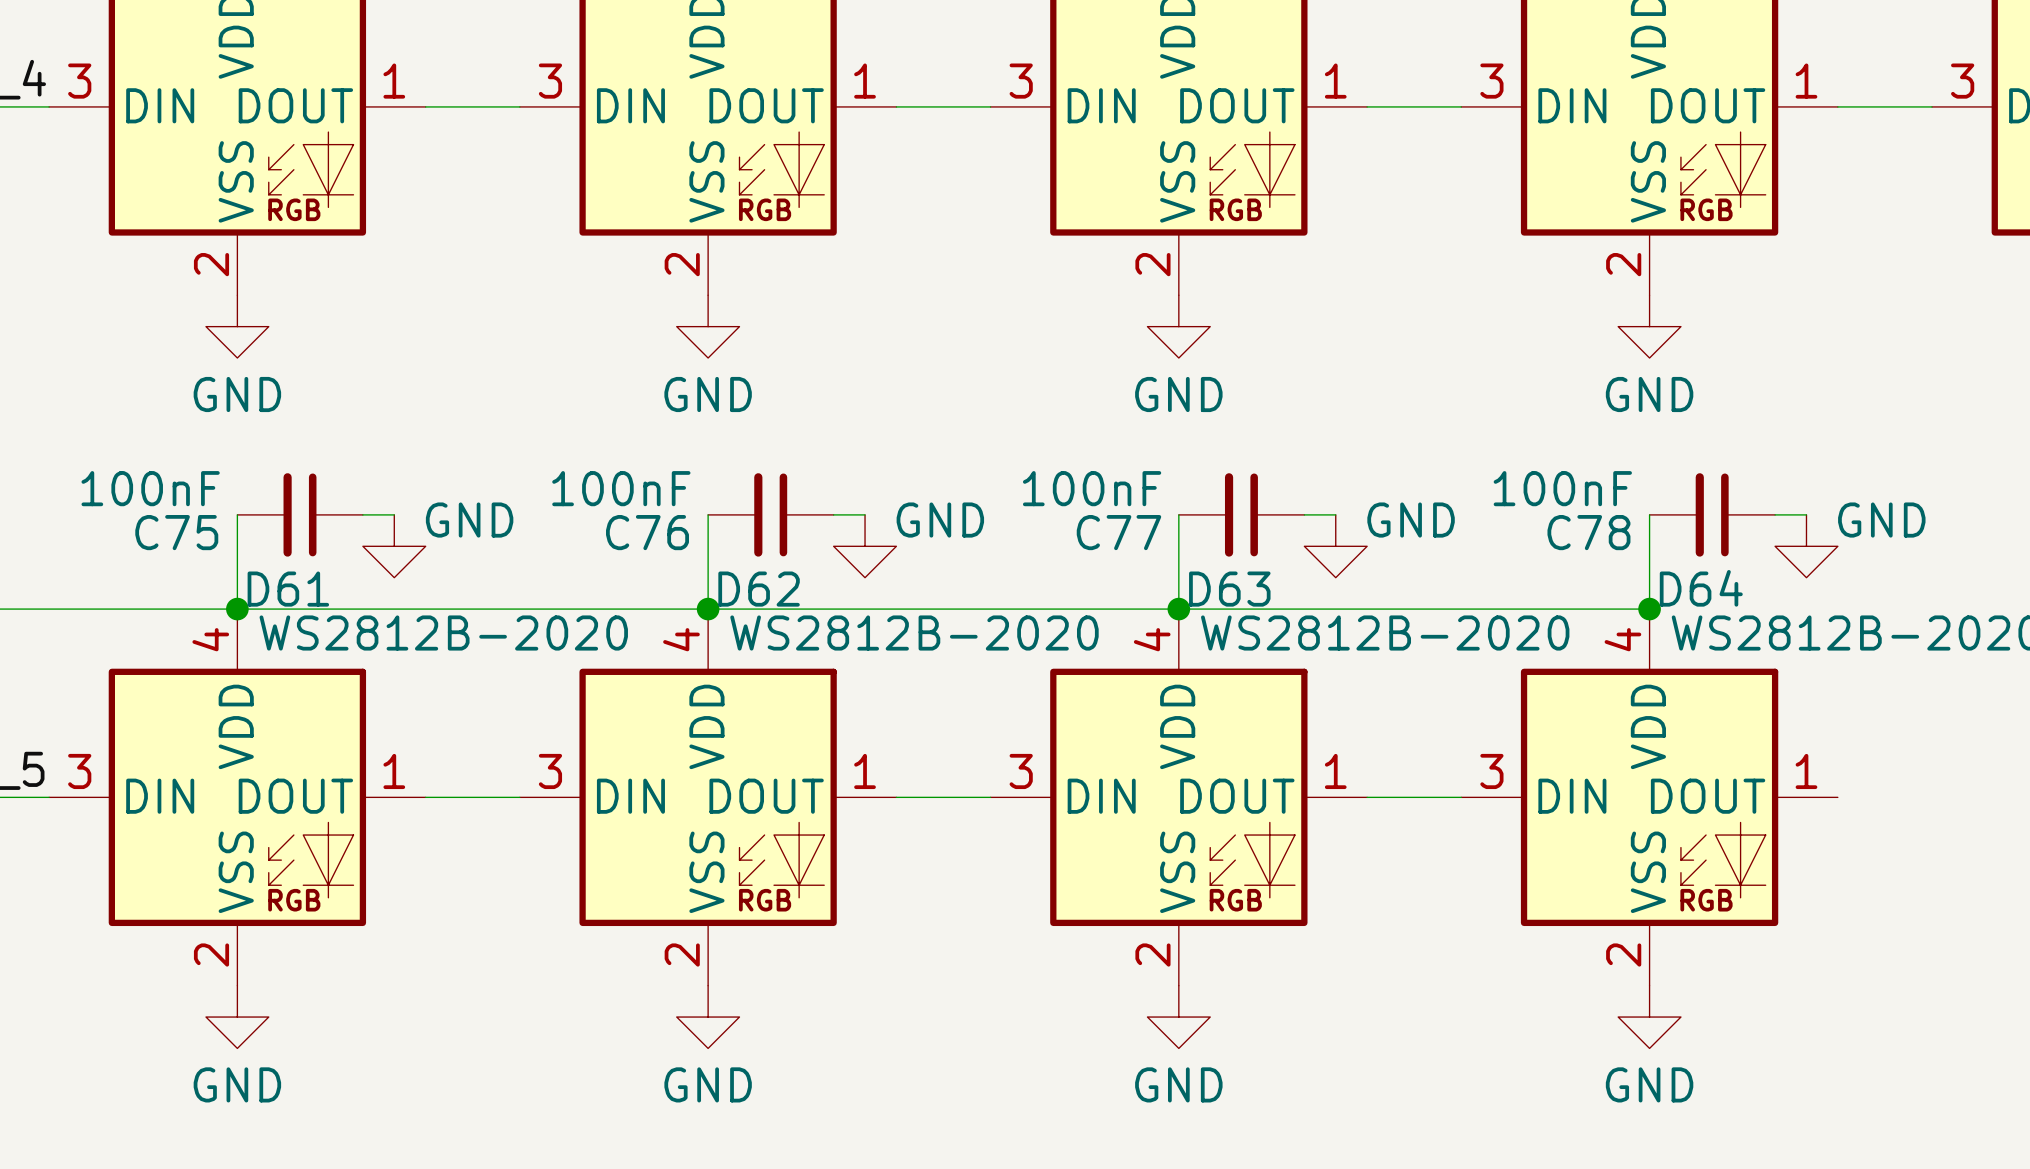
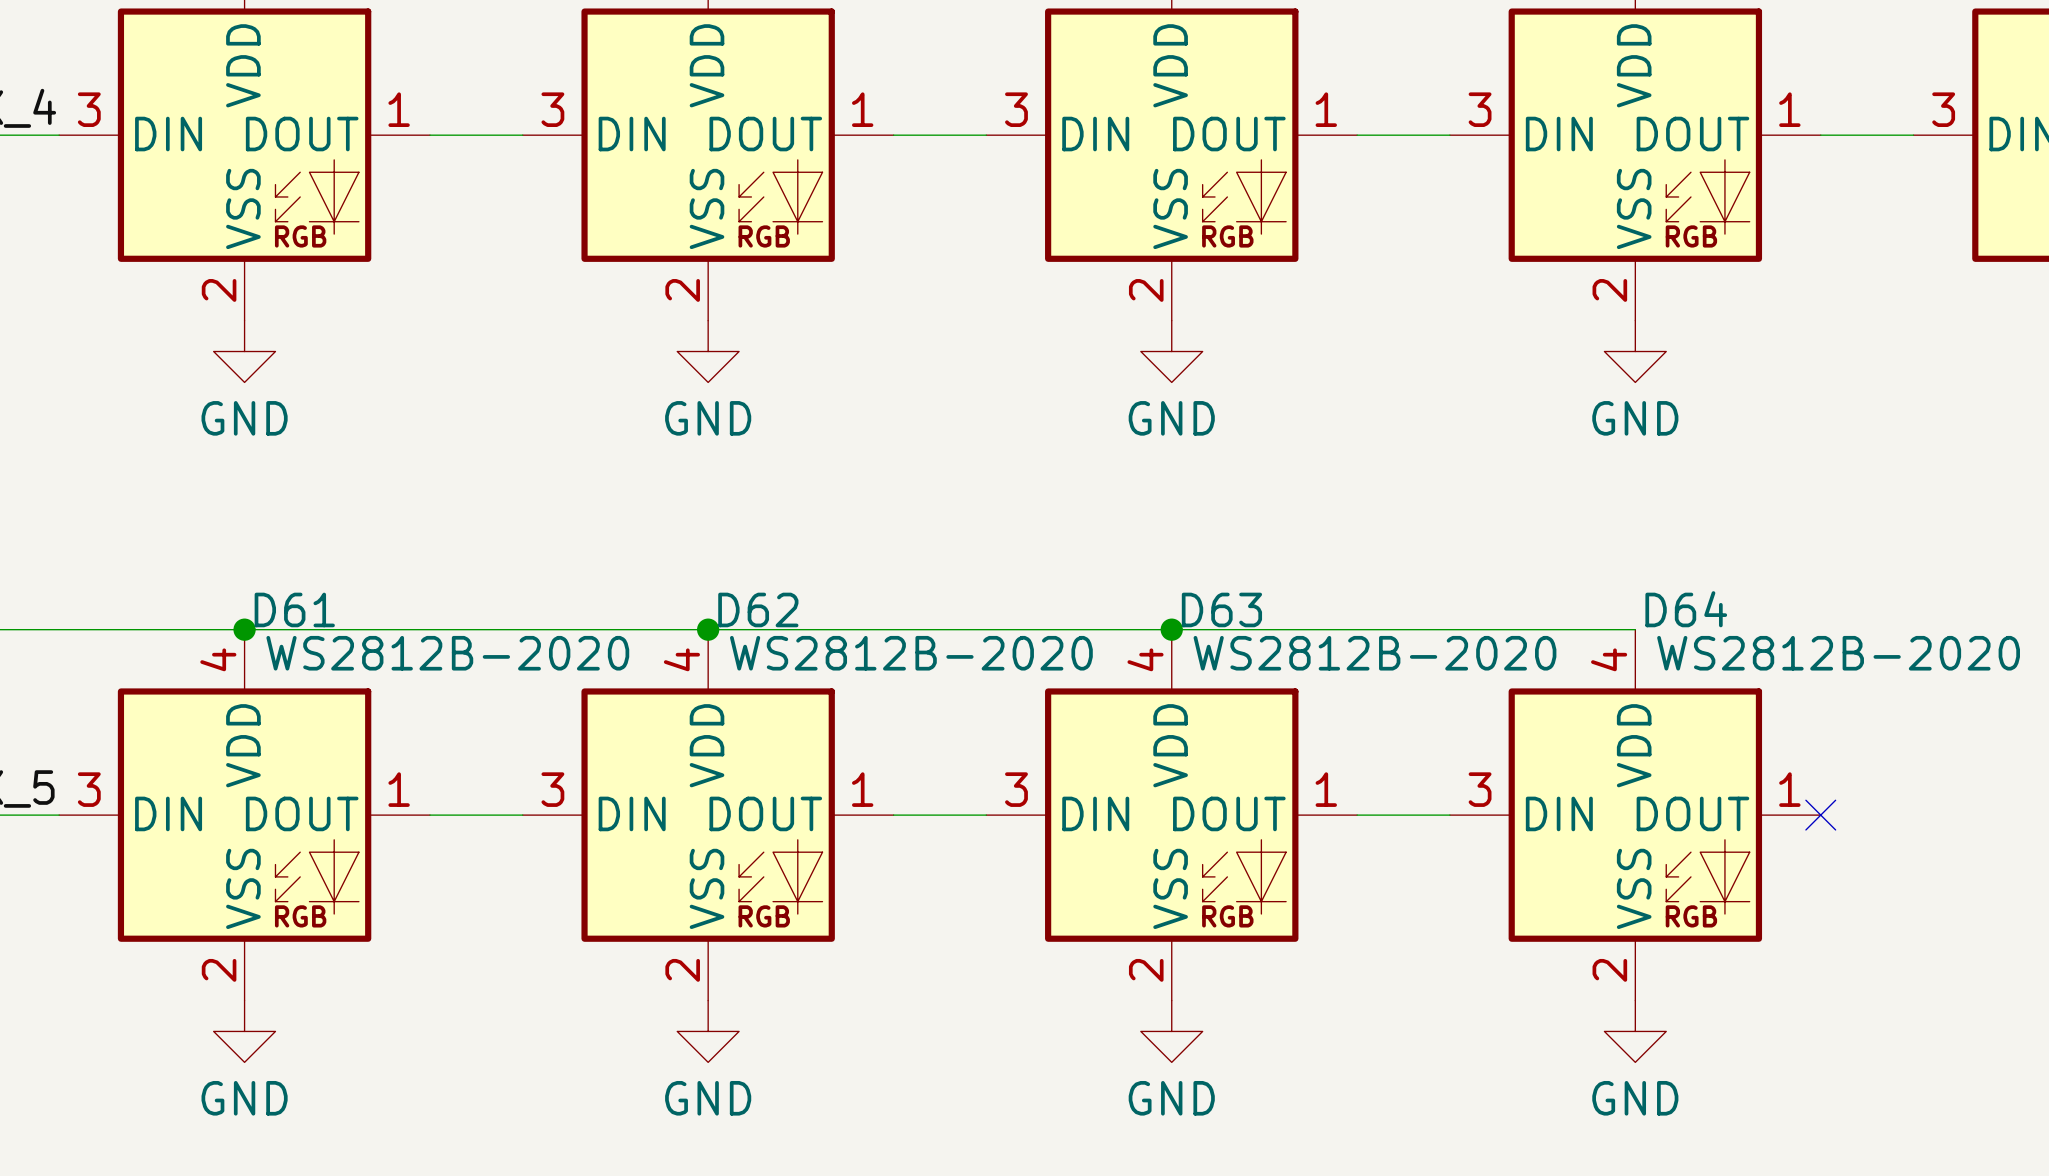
wire: (237, 514) (237, 609) -> none
C75: 100nF (300, 514) -> none
wire: (362, 514) (394, 514) -> none
wire: (708, 514) (708, 609) -> none
C76: 100nF (770, 514) -> none
wire: (833, 514) (865, 514) -> none
wire: (1178, 514) (1178, 609) -> none
C77: 100nF (1241, 514) -> none
wire: (1304, 514) (1335, 514) -> none
wire: (1649, 514) (1649, 609) -> none
C78: 100nF (1712, 514) -> none
wire: (1775, 514) (1806, 514) -> none
power symbol: GND (394, 546) -> none
power symbol: GND (865, 546) -> none
power symbol: GND (1335, 546) -> none
power symbol: GND (1806, 546) -> none
junction: (1649, 609) -> none
no-connect mark: none -> (1820, 815)

